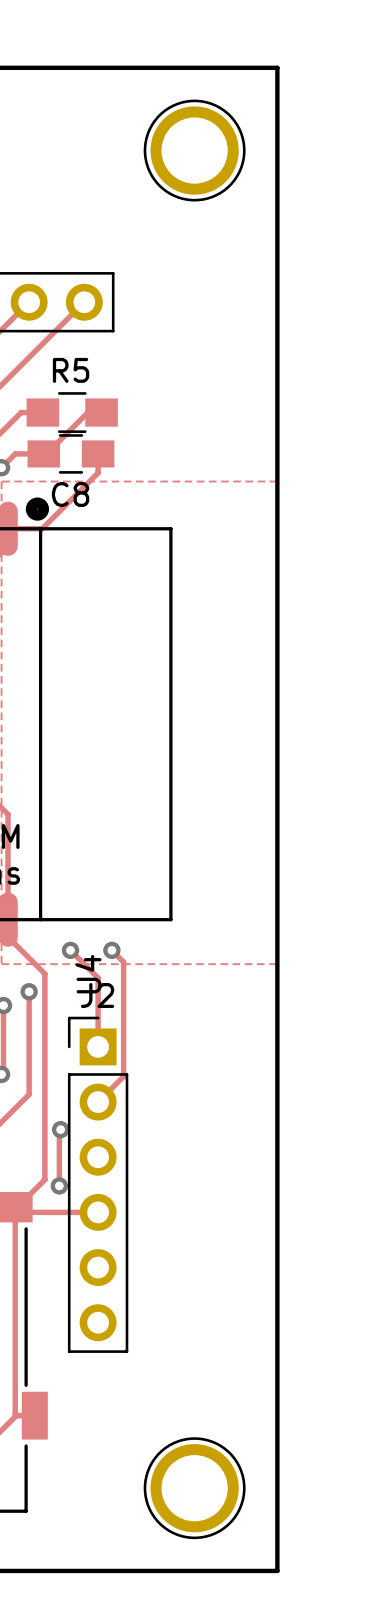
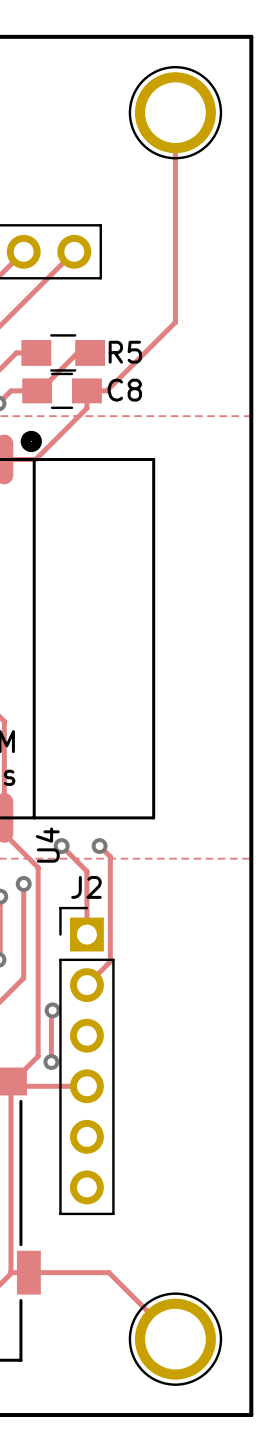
track: none -> (175, 112) (175, 322) (106, 390) (86, 390)
R5 name position: R5 (71, 370) -> R5 (125, 352)
C8 name position: C8 (70, 494) -> C8 (124, 390)
U4 name position: U4 (88, 974) -> U4 (47, 845)
track: none -> (28, 1272) (108, 1272) (175, 1339)

